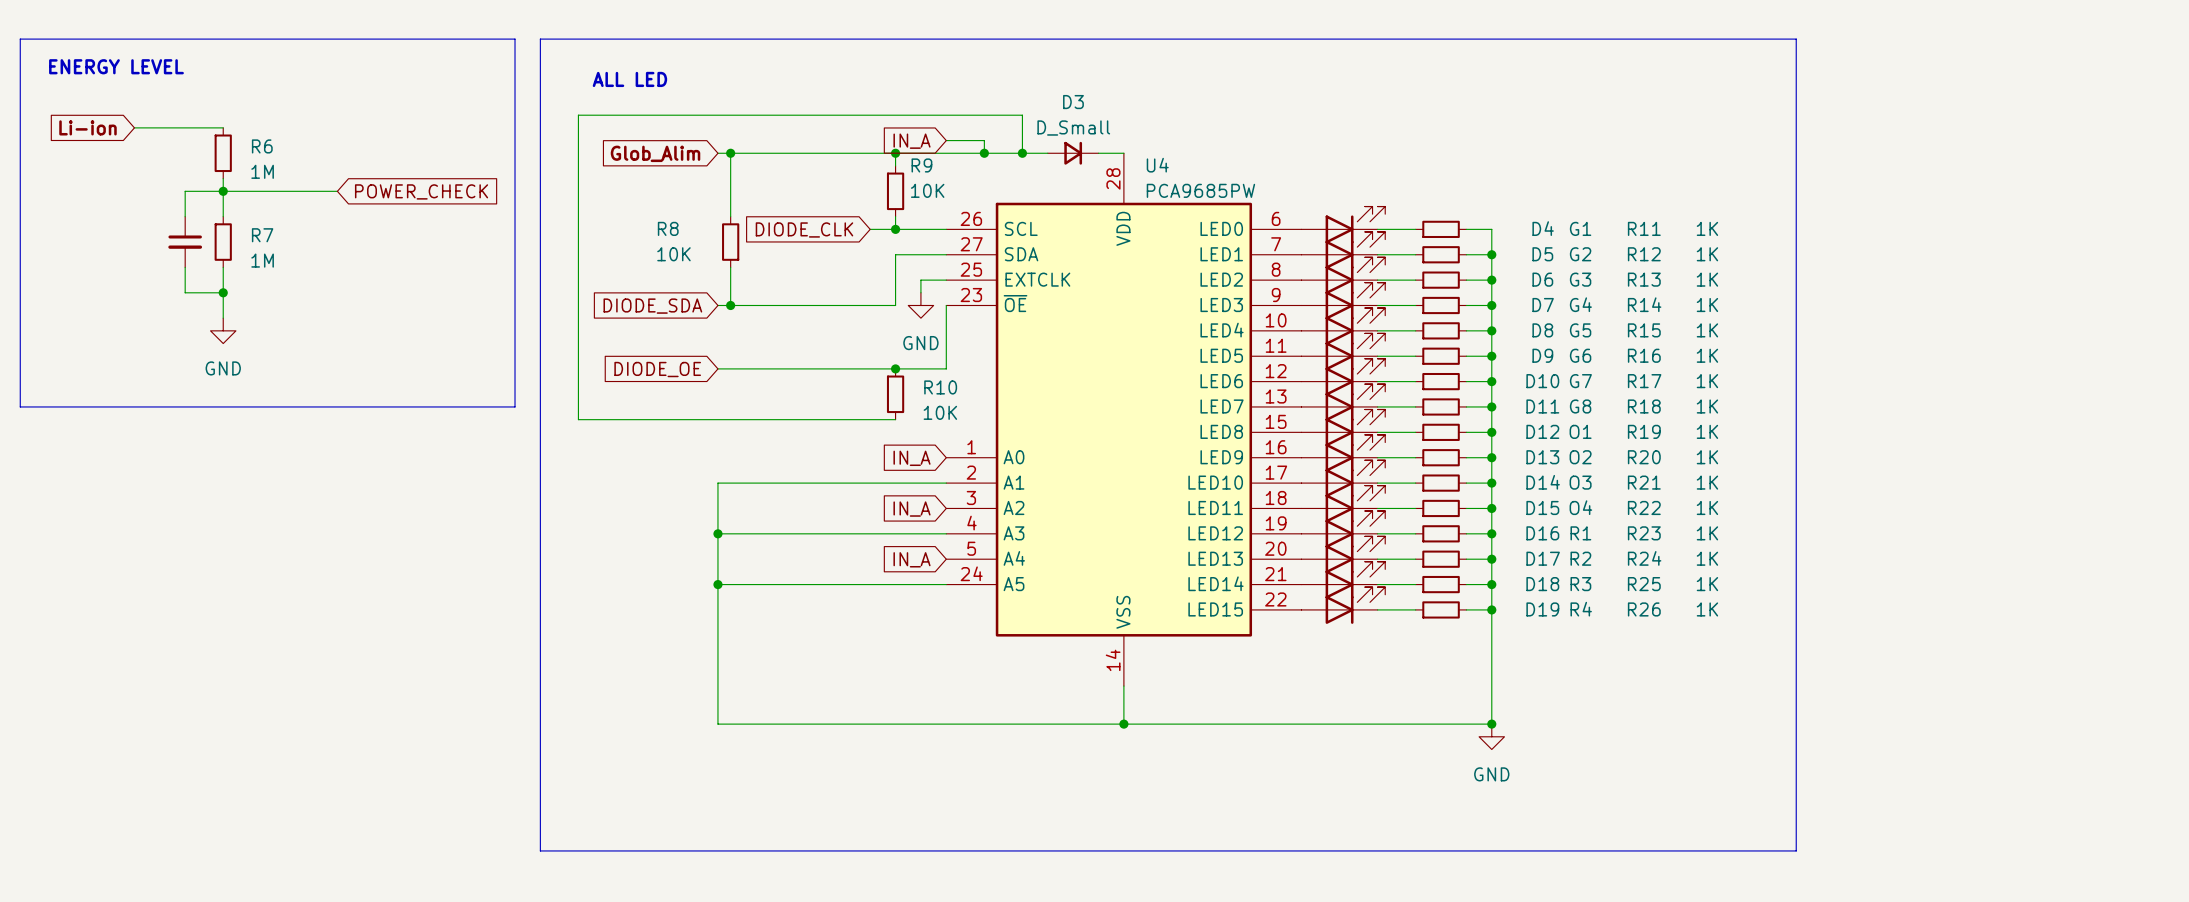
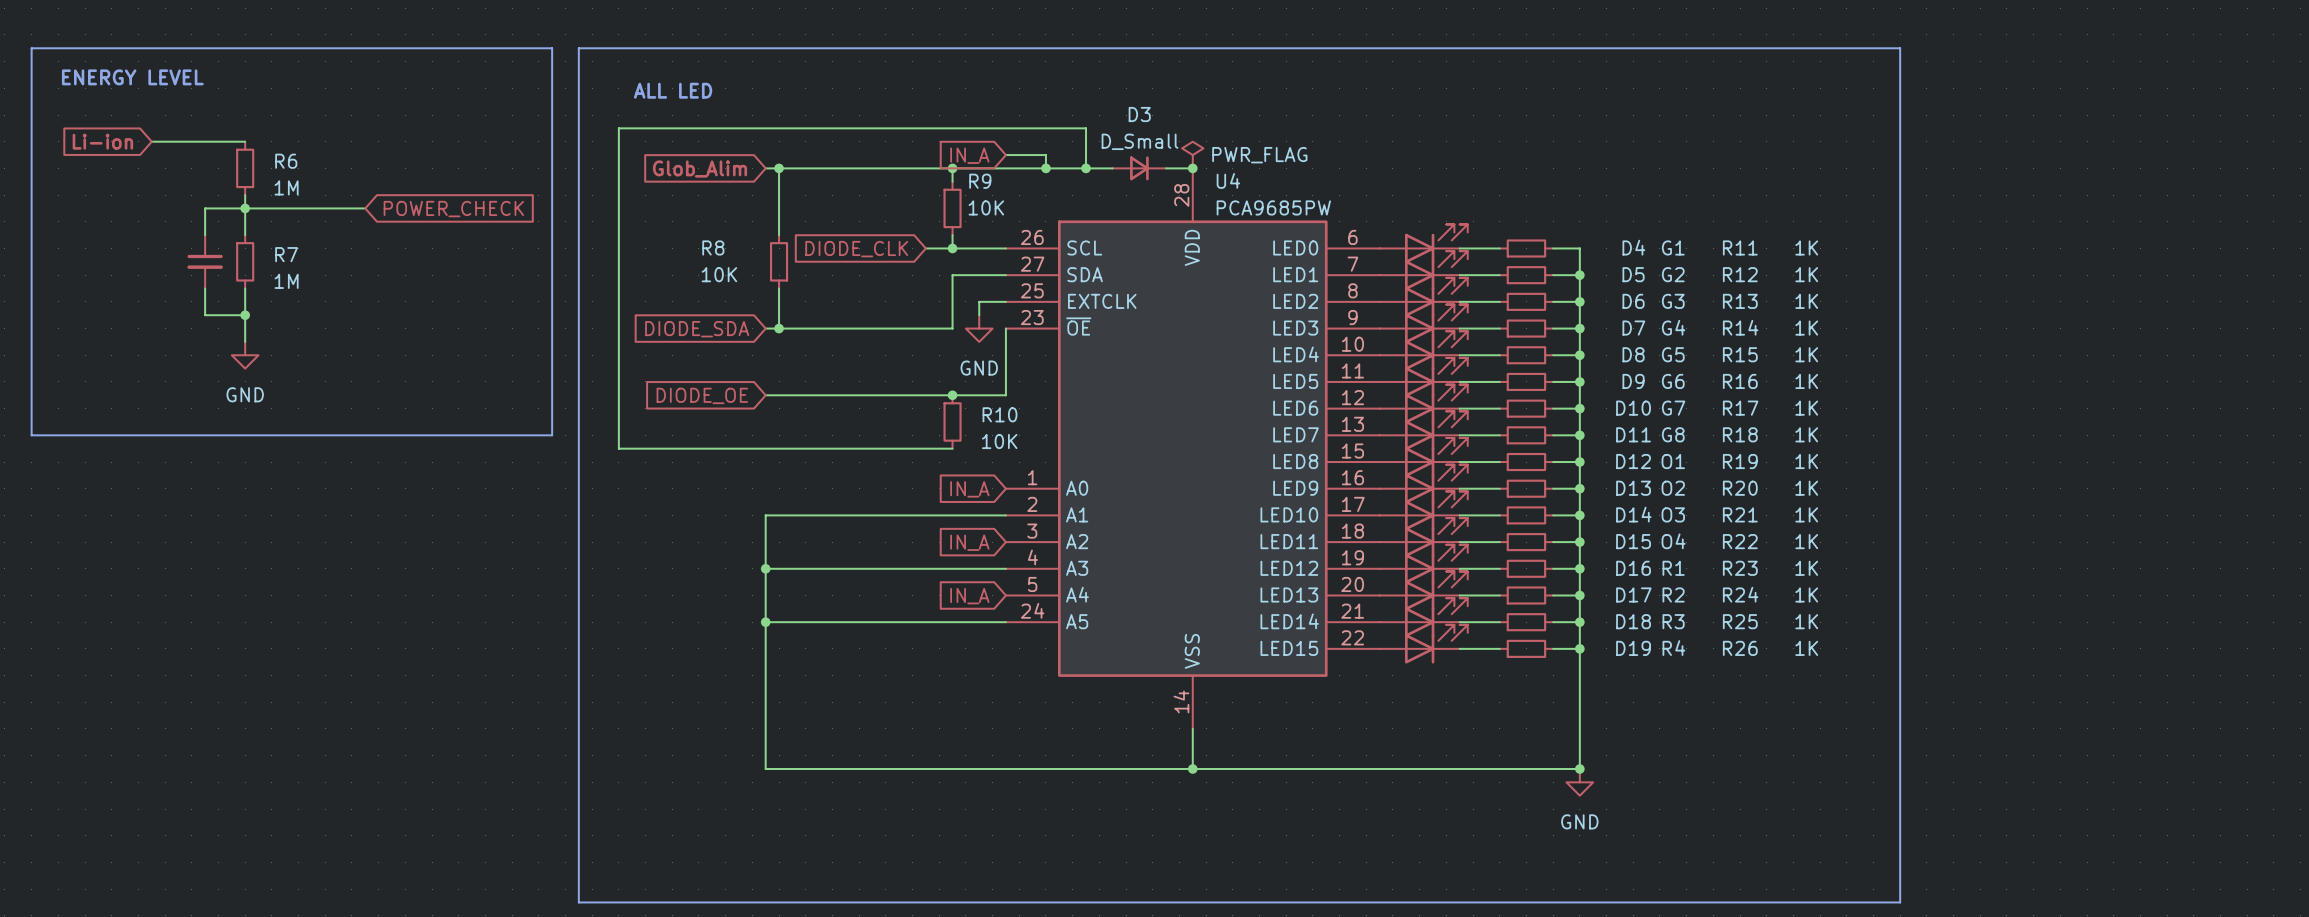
power symbol: none -> PWR_FLAG (1192, 155)
junction: none -> (1192, 168)

